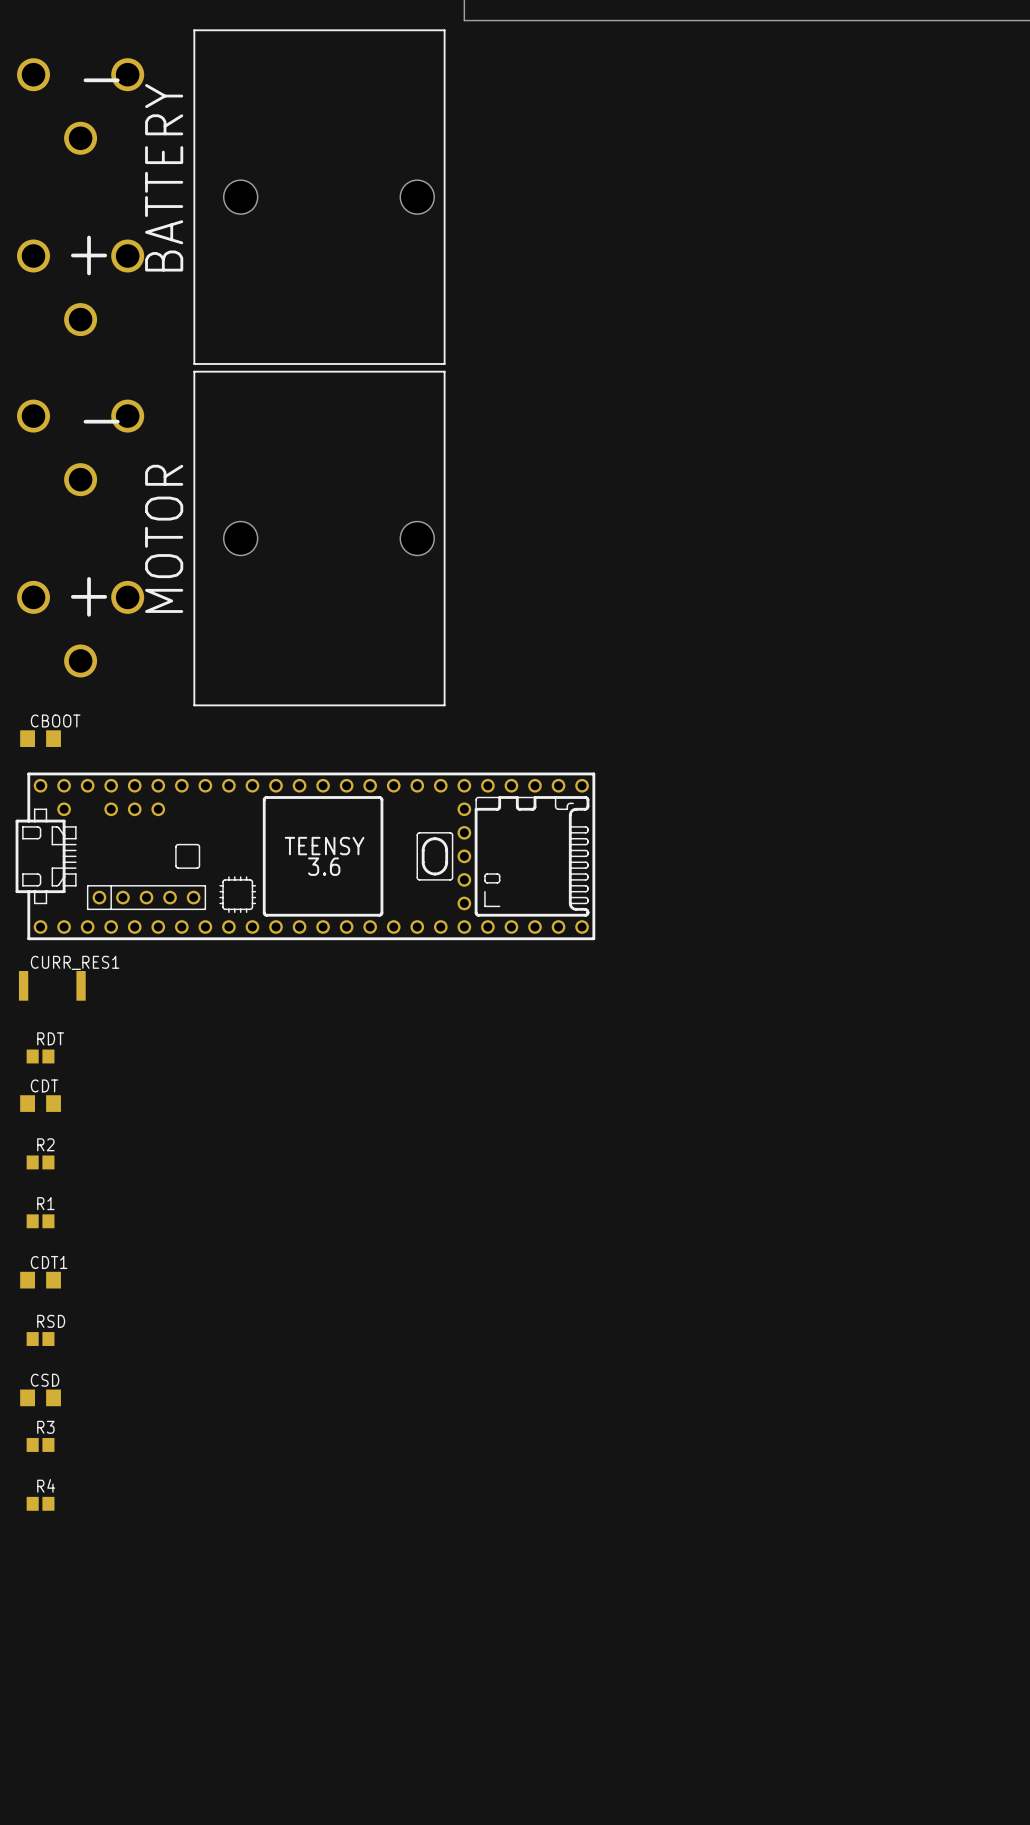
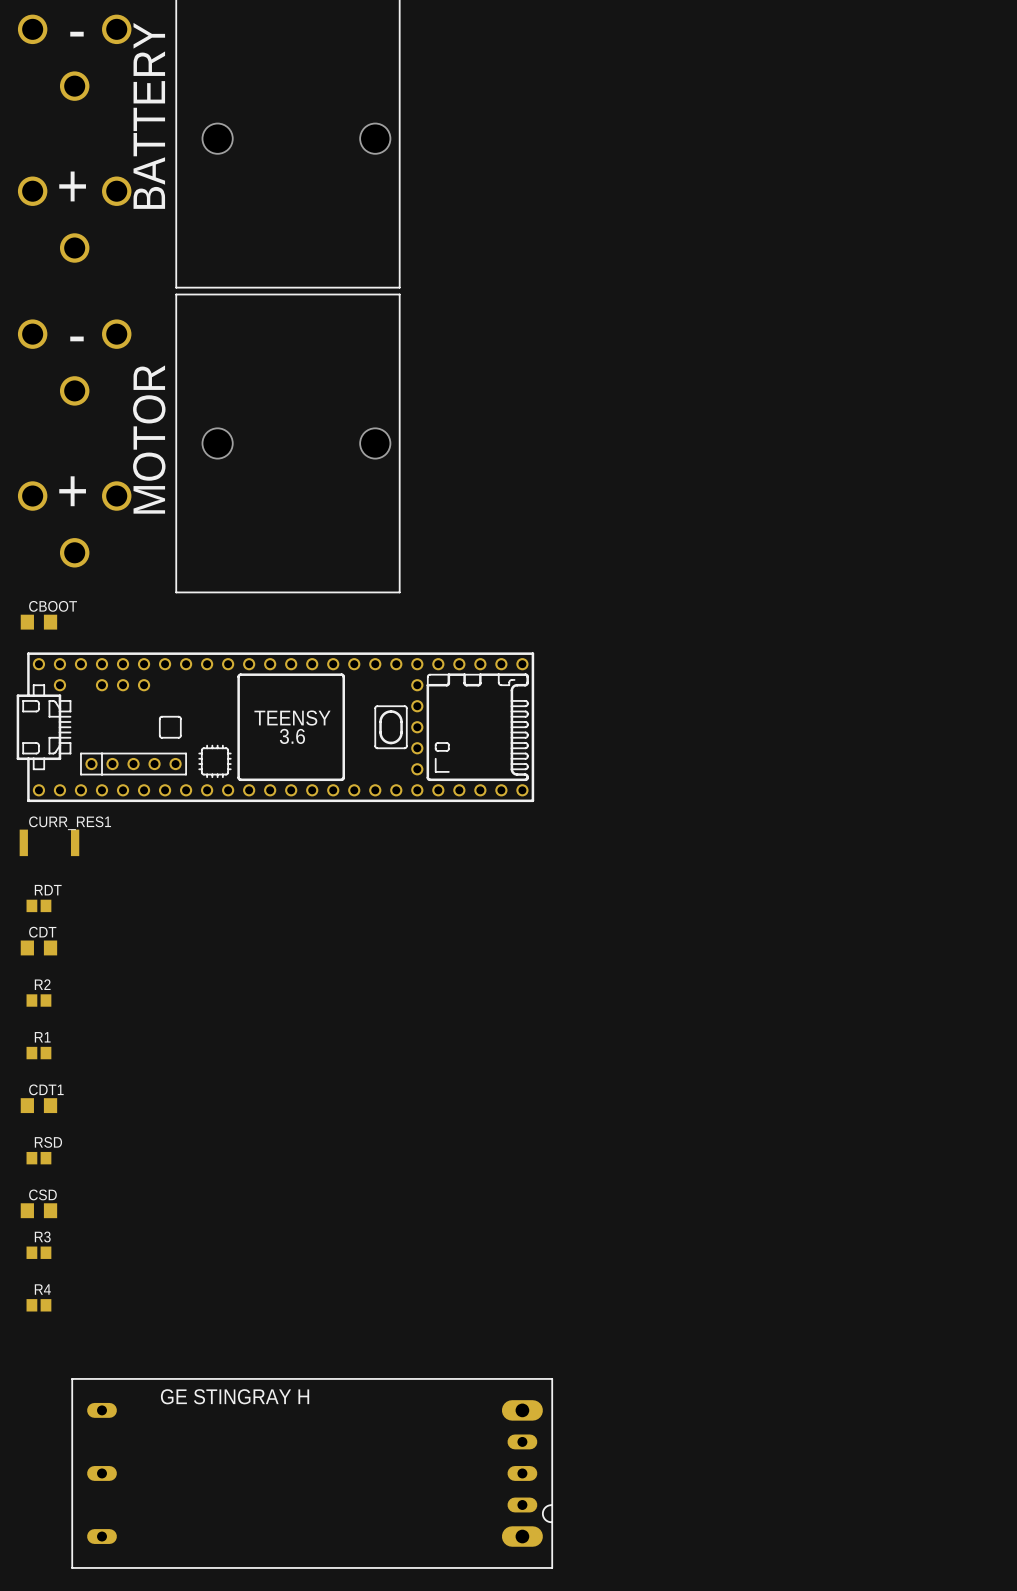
part: none -> (312, 1473)

